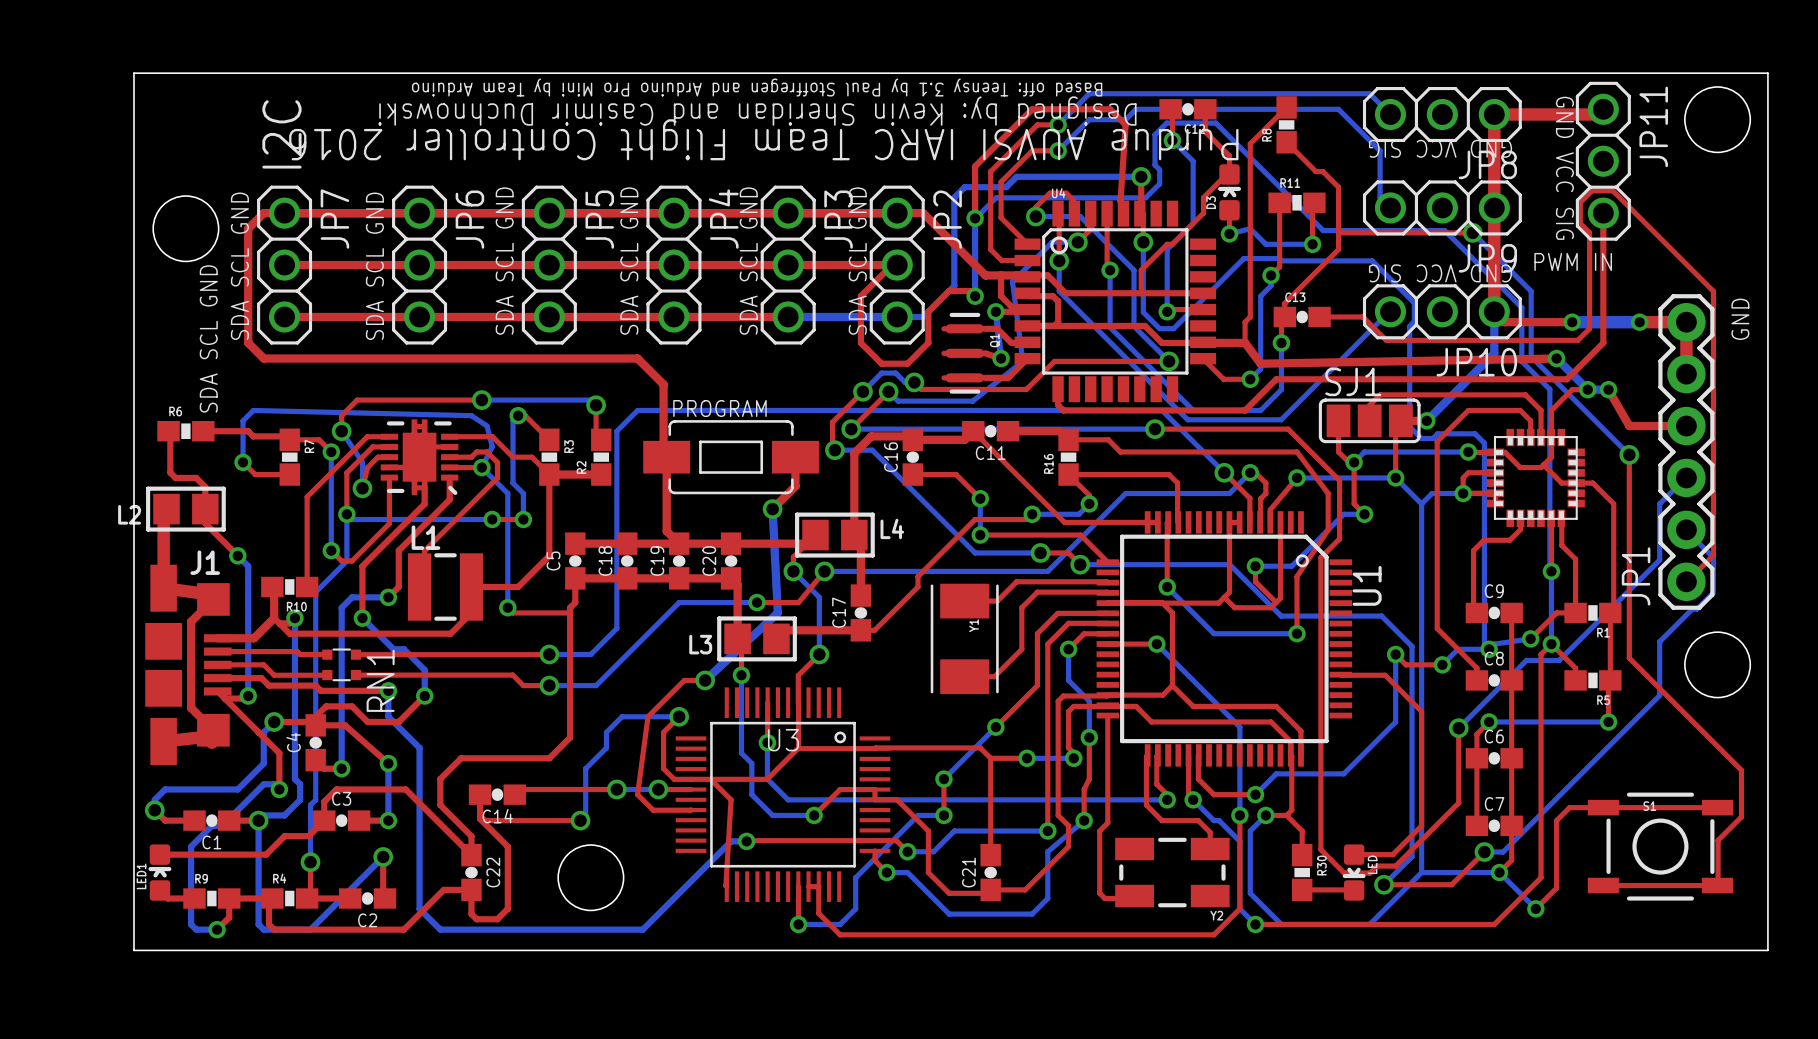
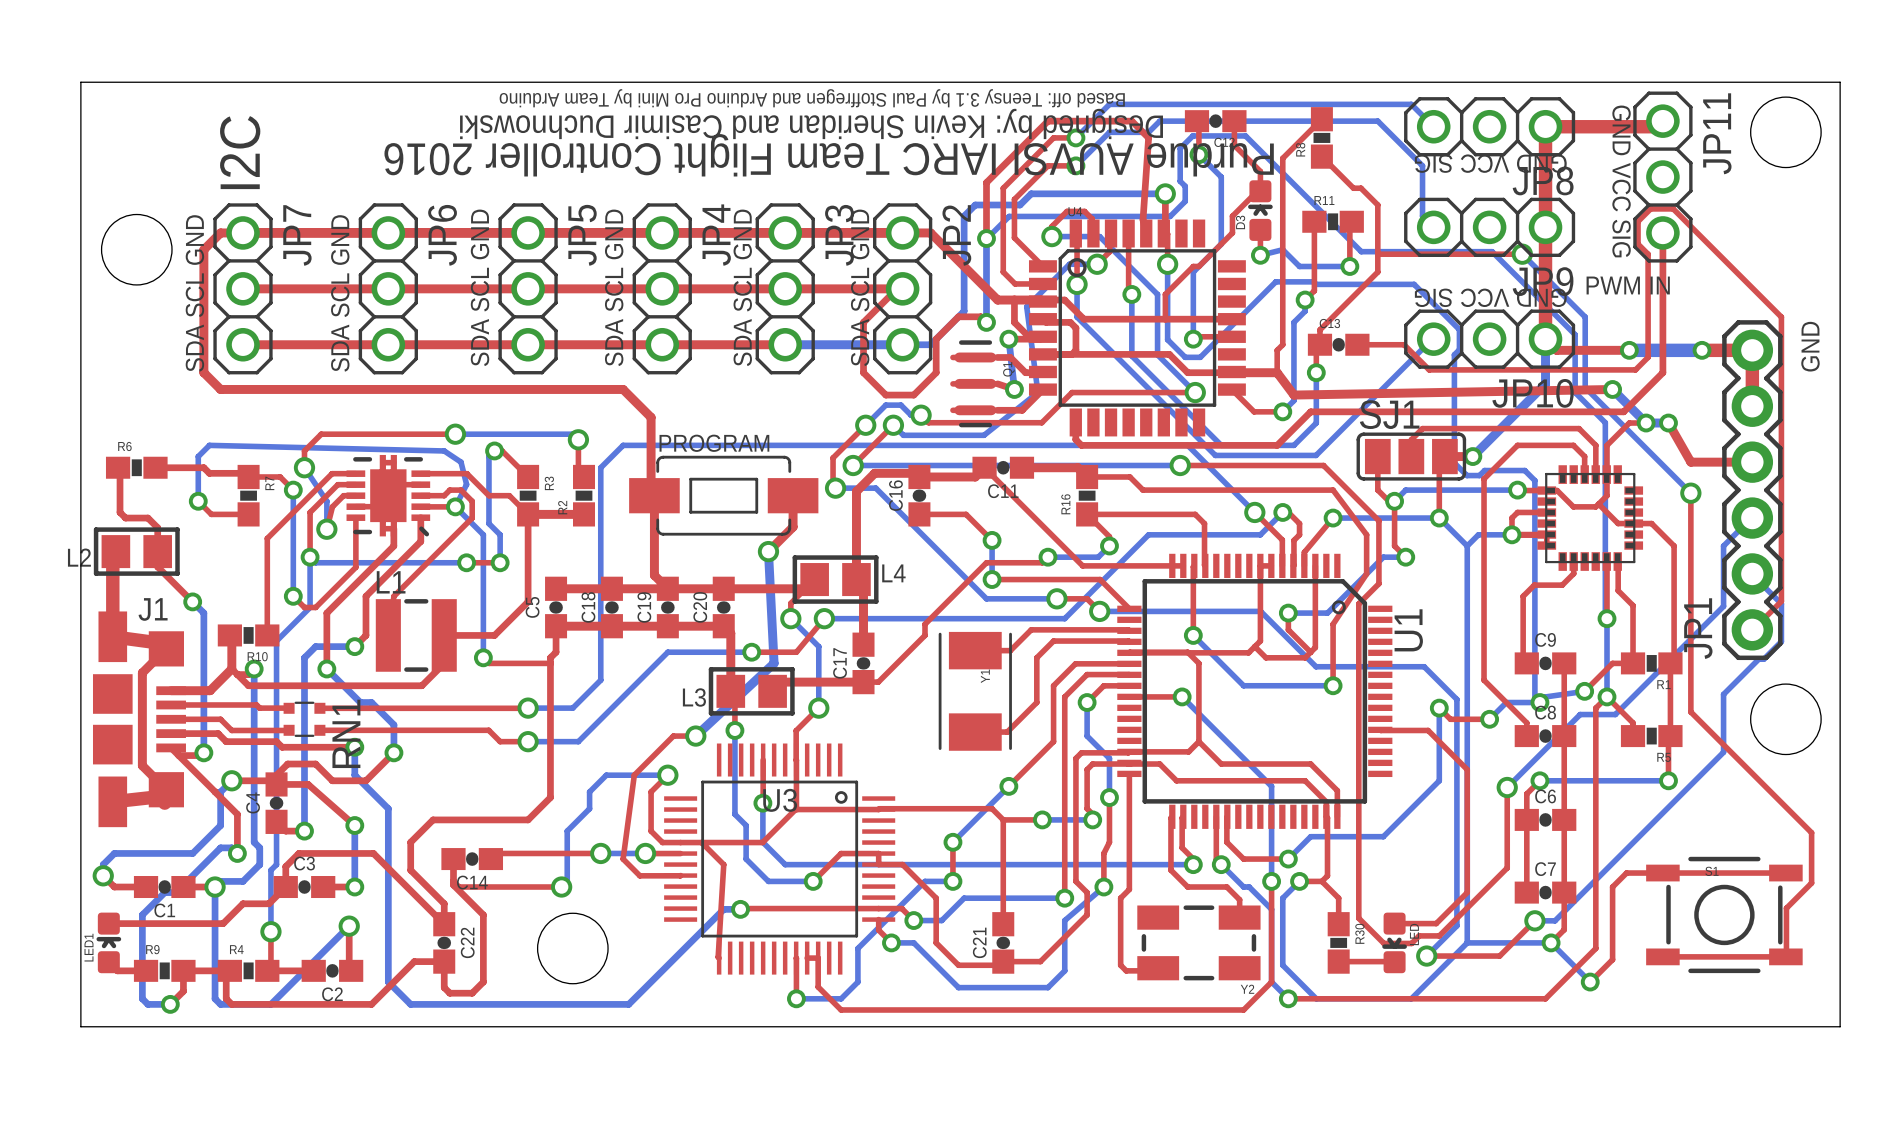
text: SDA SCL GND (208, 338) -> none

